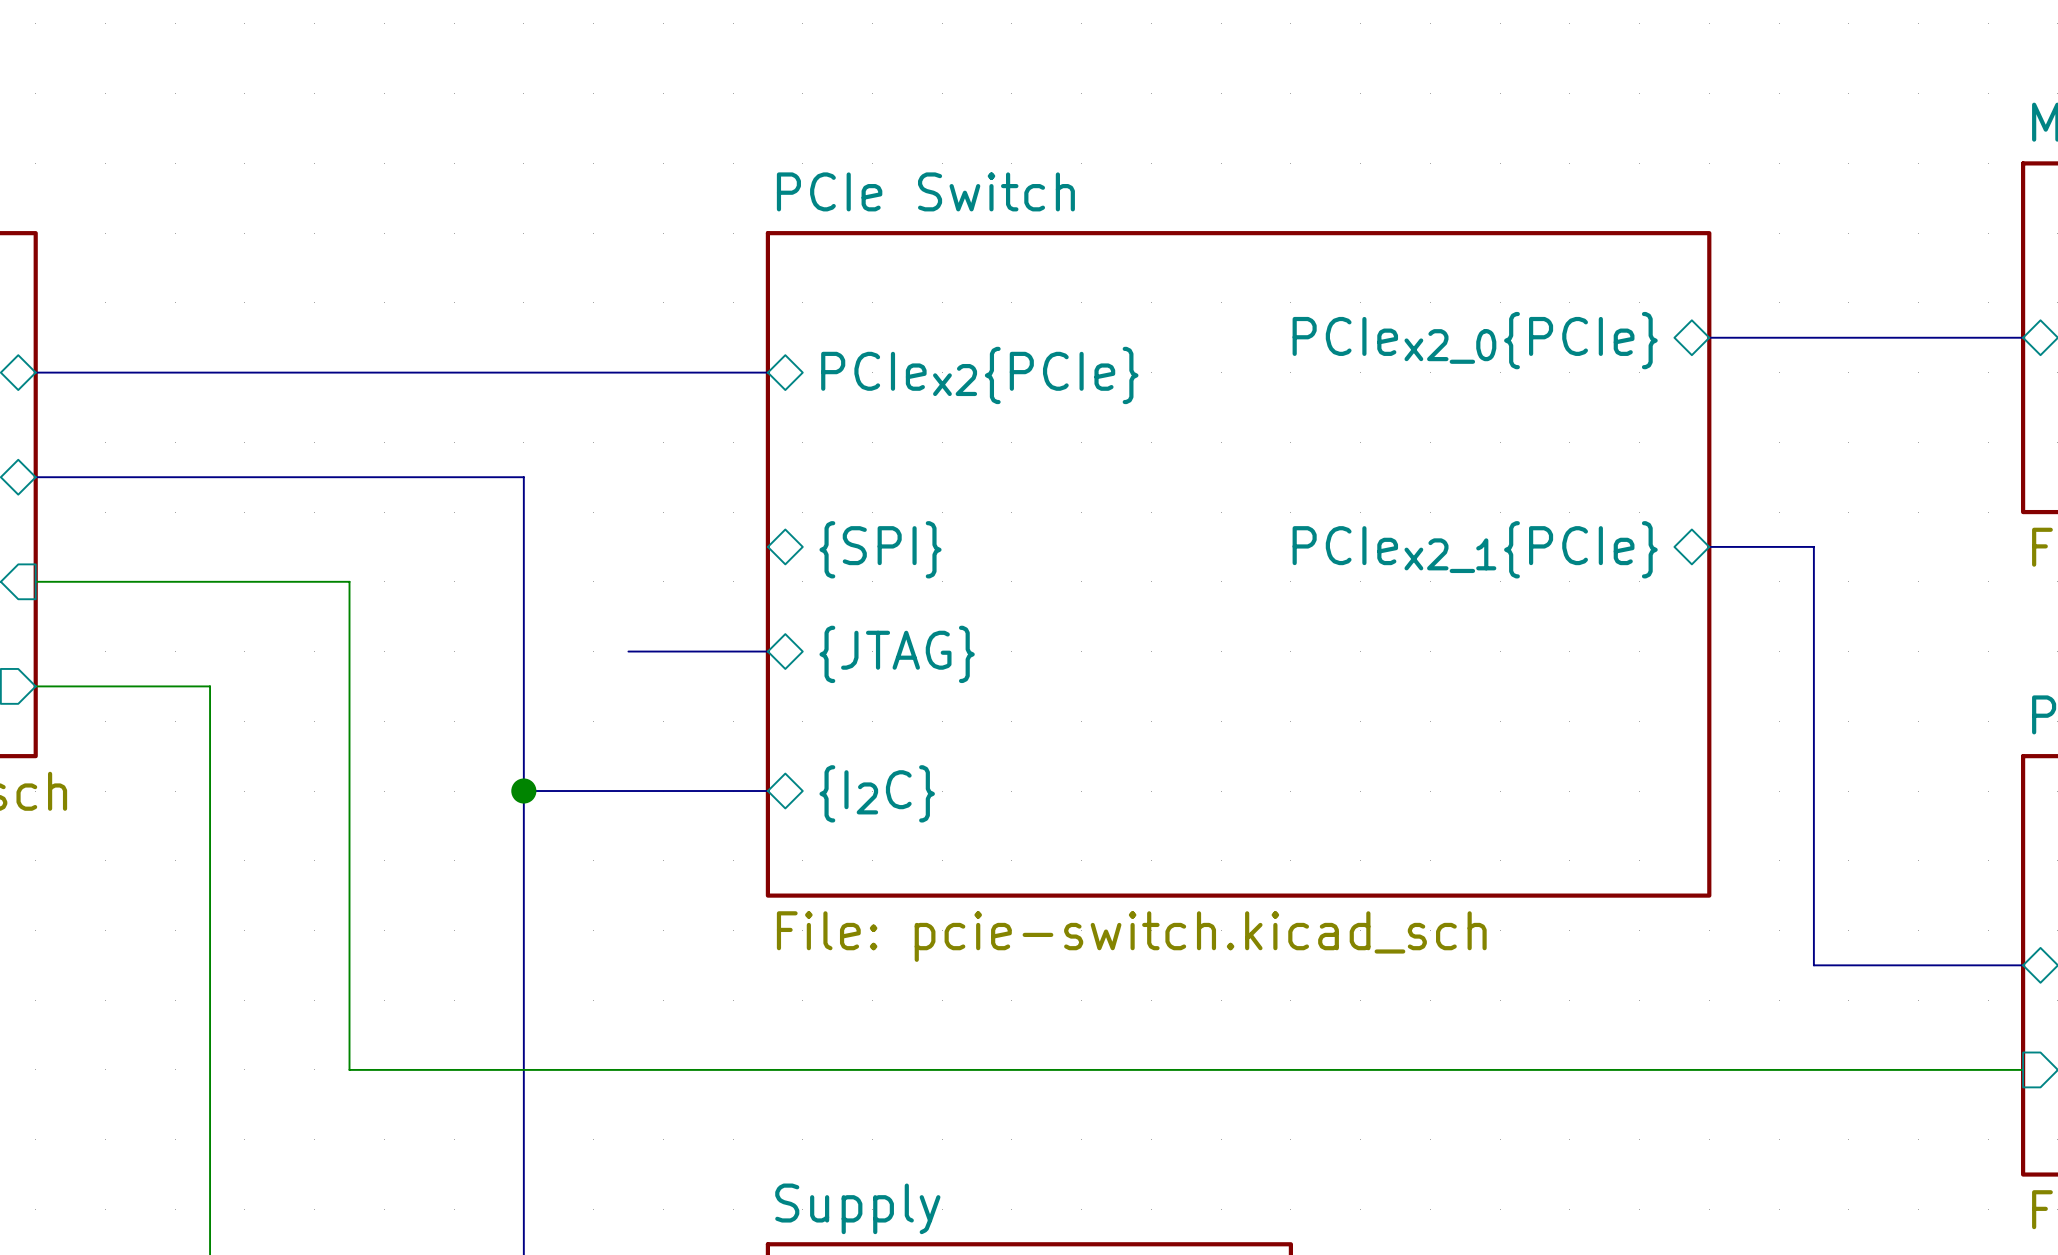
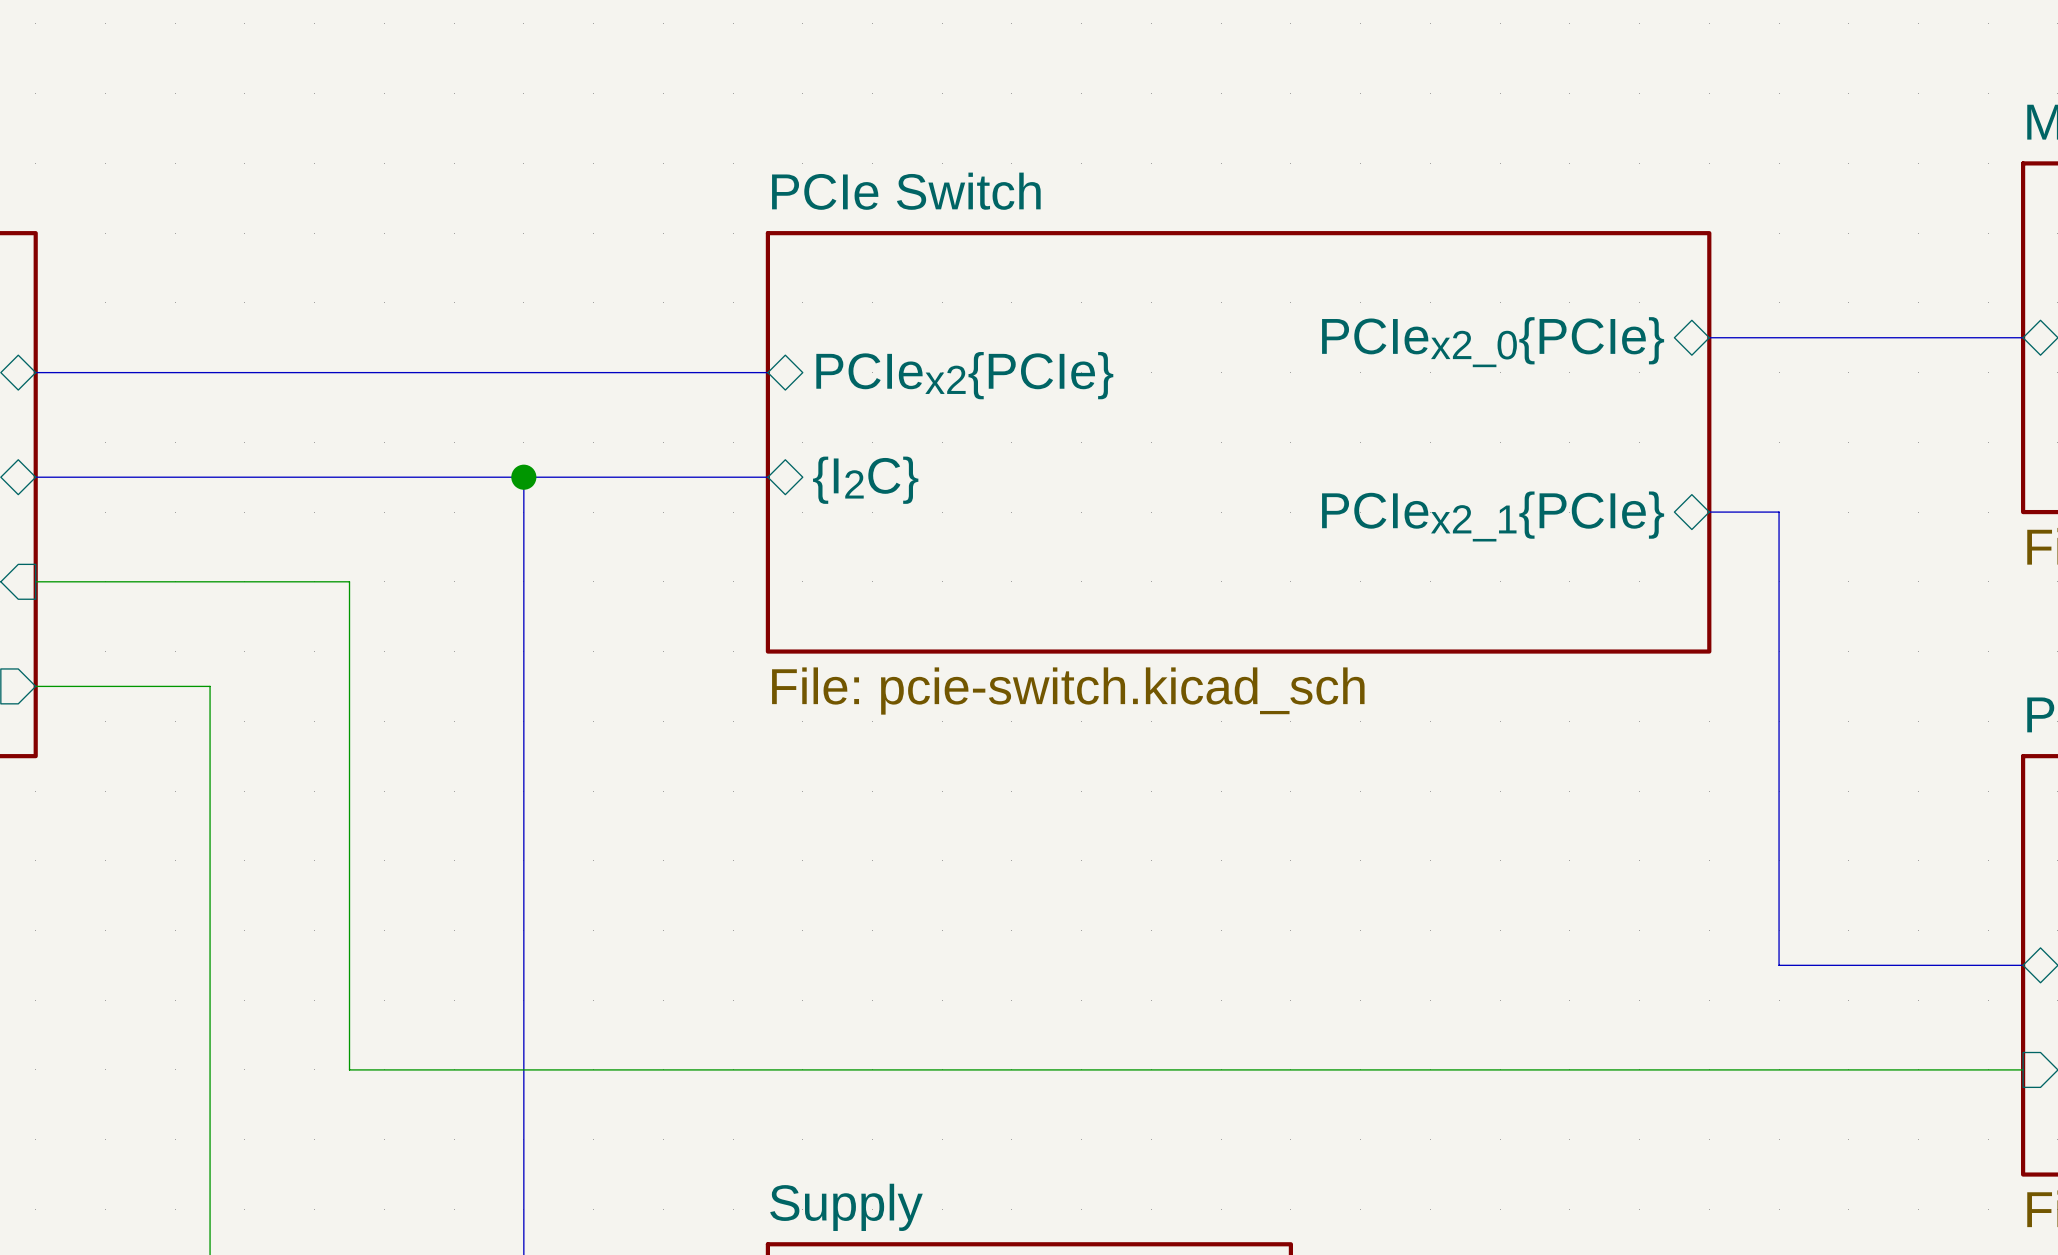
sheet PCIe Switch: none -> File: pcie-switch.kicad_sch (1238, 442)
junction: none -> (523, 477)
bus: (1709, 546) (1813, 546) (1813, 965) -> (1709, 512) (1779, 512) (1779, 965) (1813, 965)
sheet pin: {SPI} (880, 549) -> none
sheet pin position: PCIex2_1{PCIe} (1475, 549) -> PCIex2_1{PCIe} (1493, 516)
sheet PCIe Switch: File: pcie-switch.kicad_sch (1238, 564) -> none
bus: (628, 651) (767, 651) -> none
sheet pin: {JTAG} (897, 654) -> none
bus: (523, 791) (767, 791) -> (523, 477) (767, 477)
junction: (523, 791) -> none
sheet pin position: {I2C} (877, 793) -> {I2C} (865, 480)

